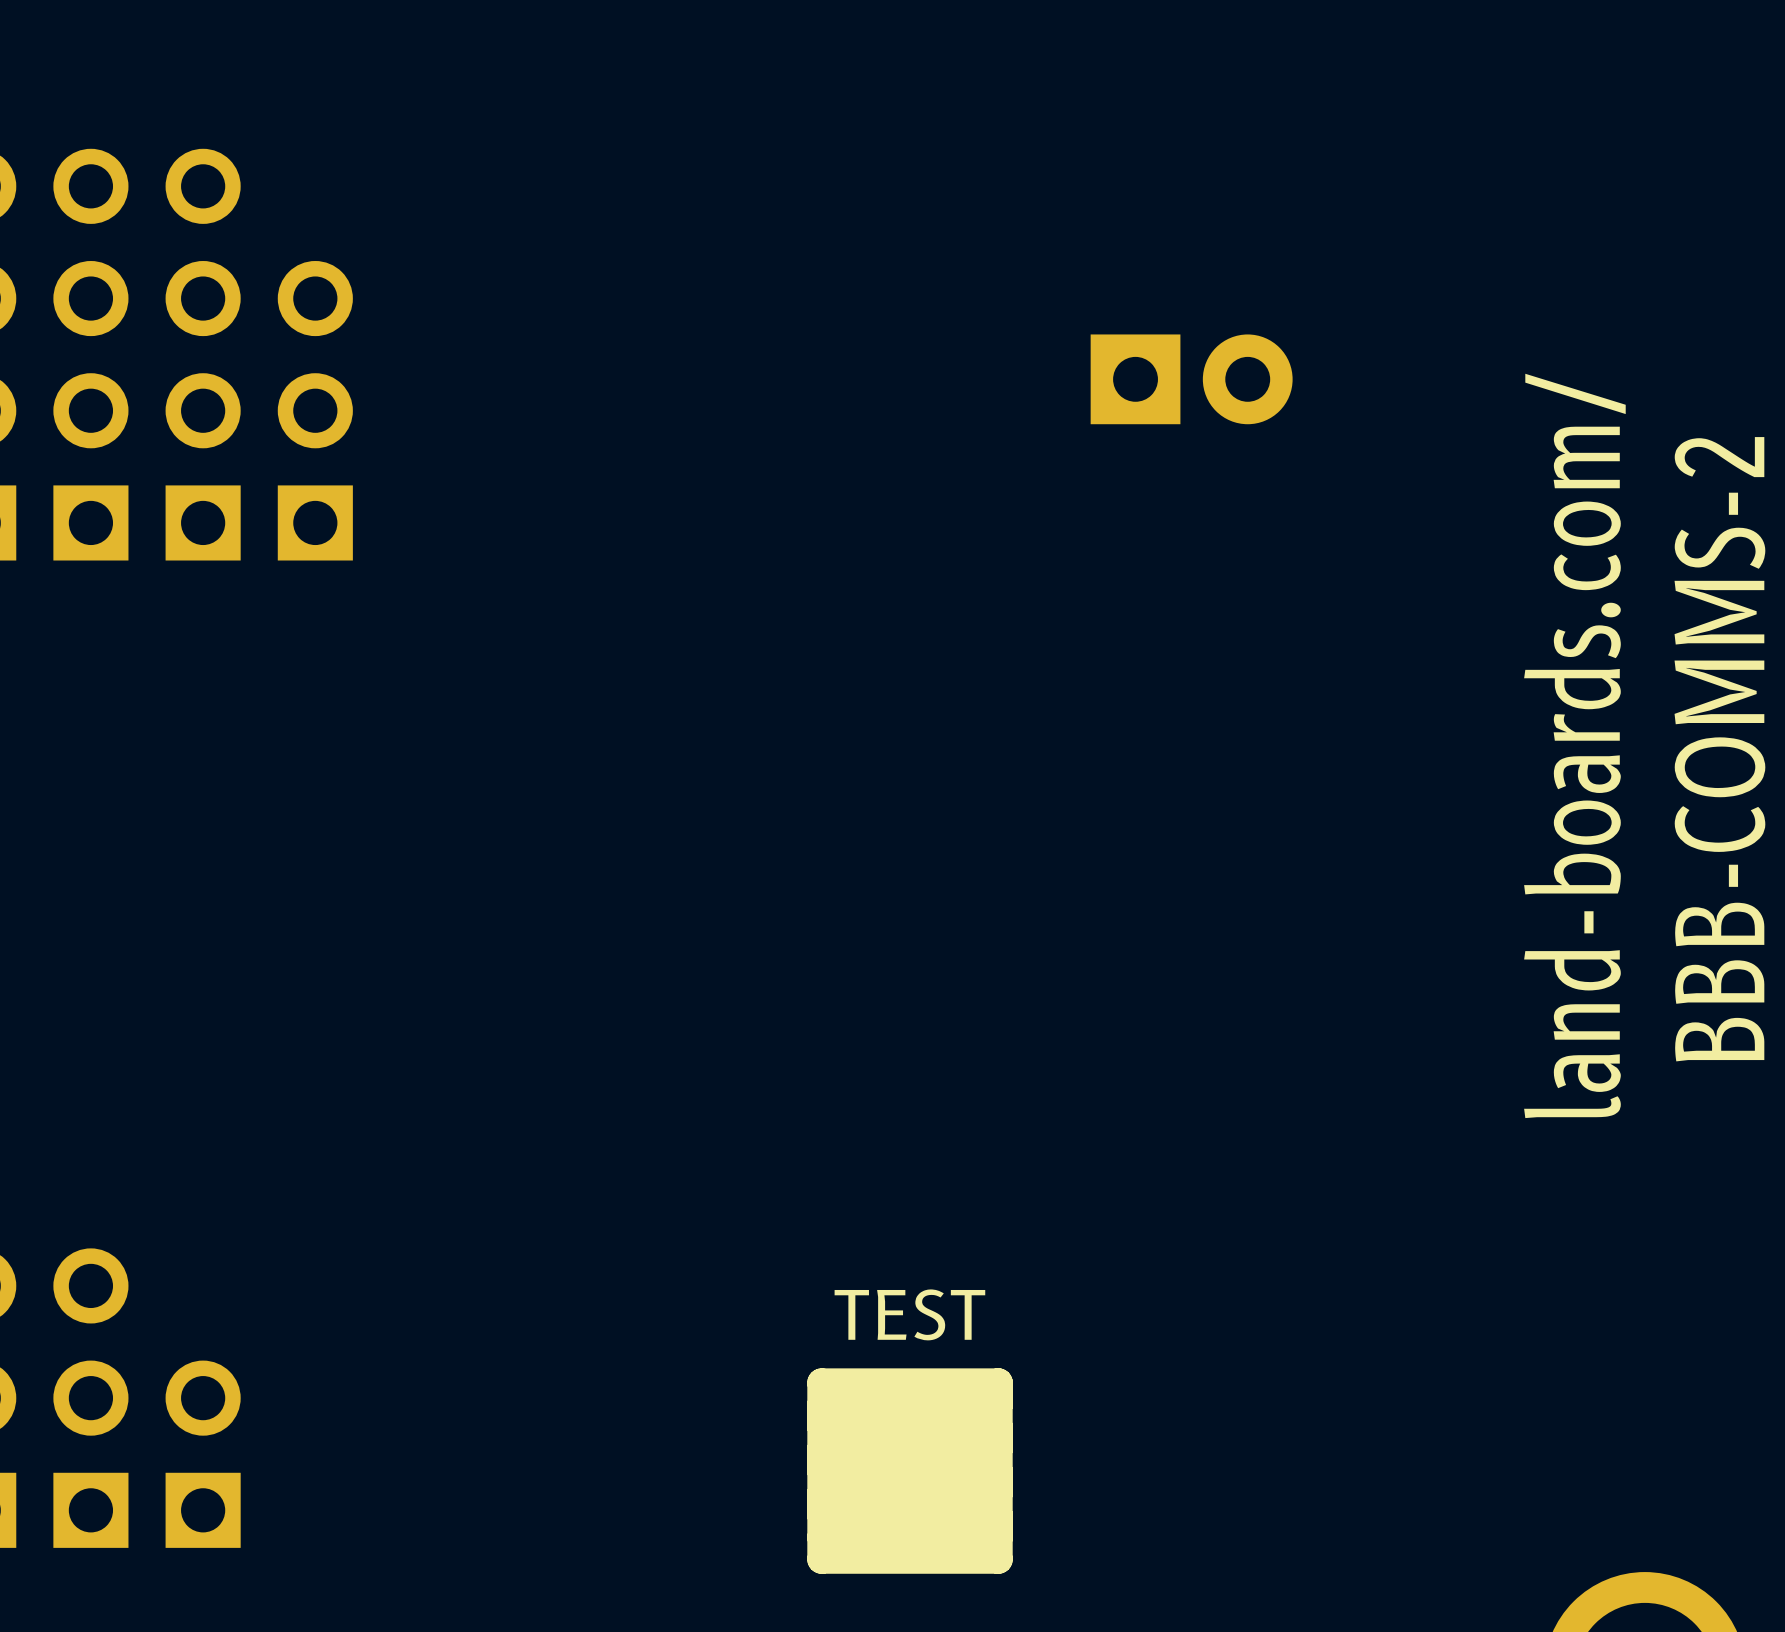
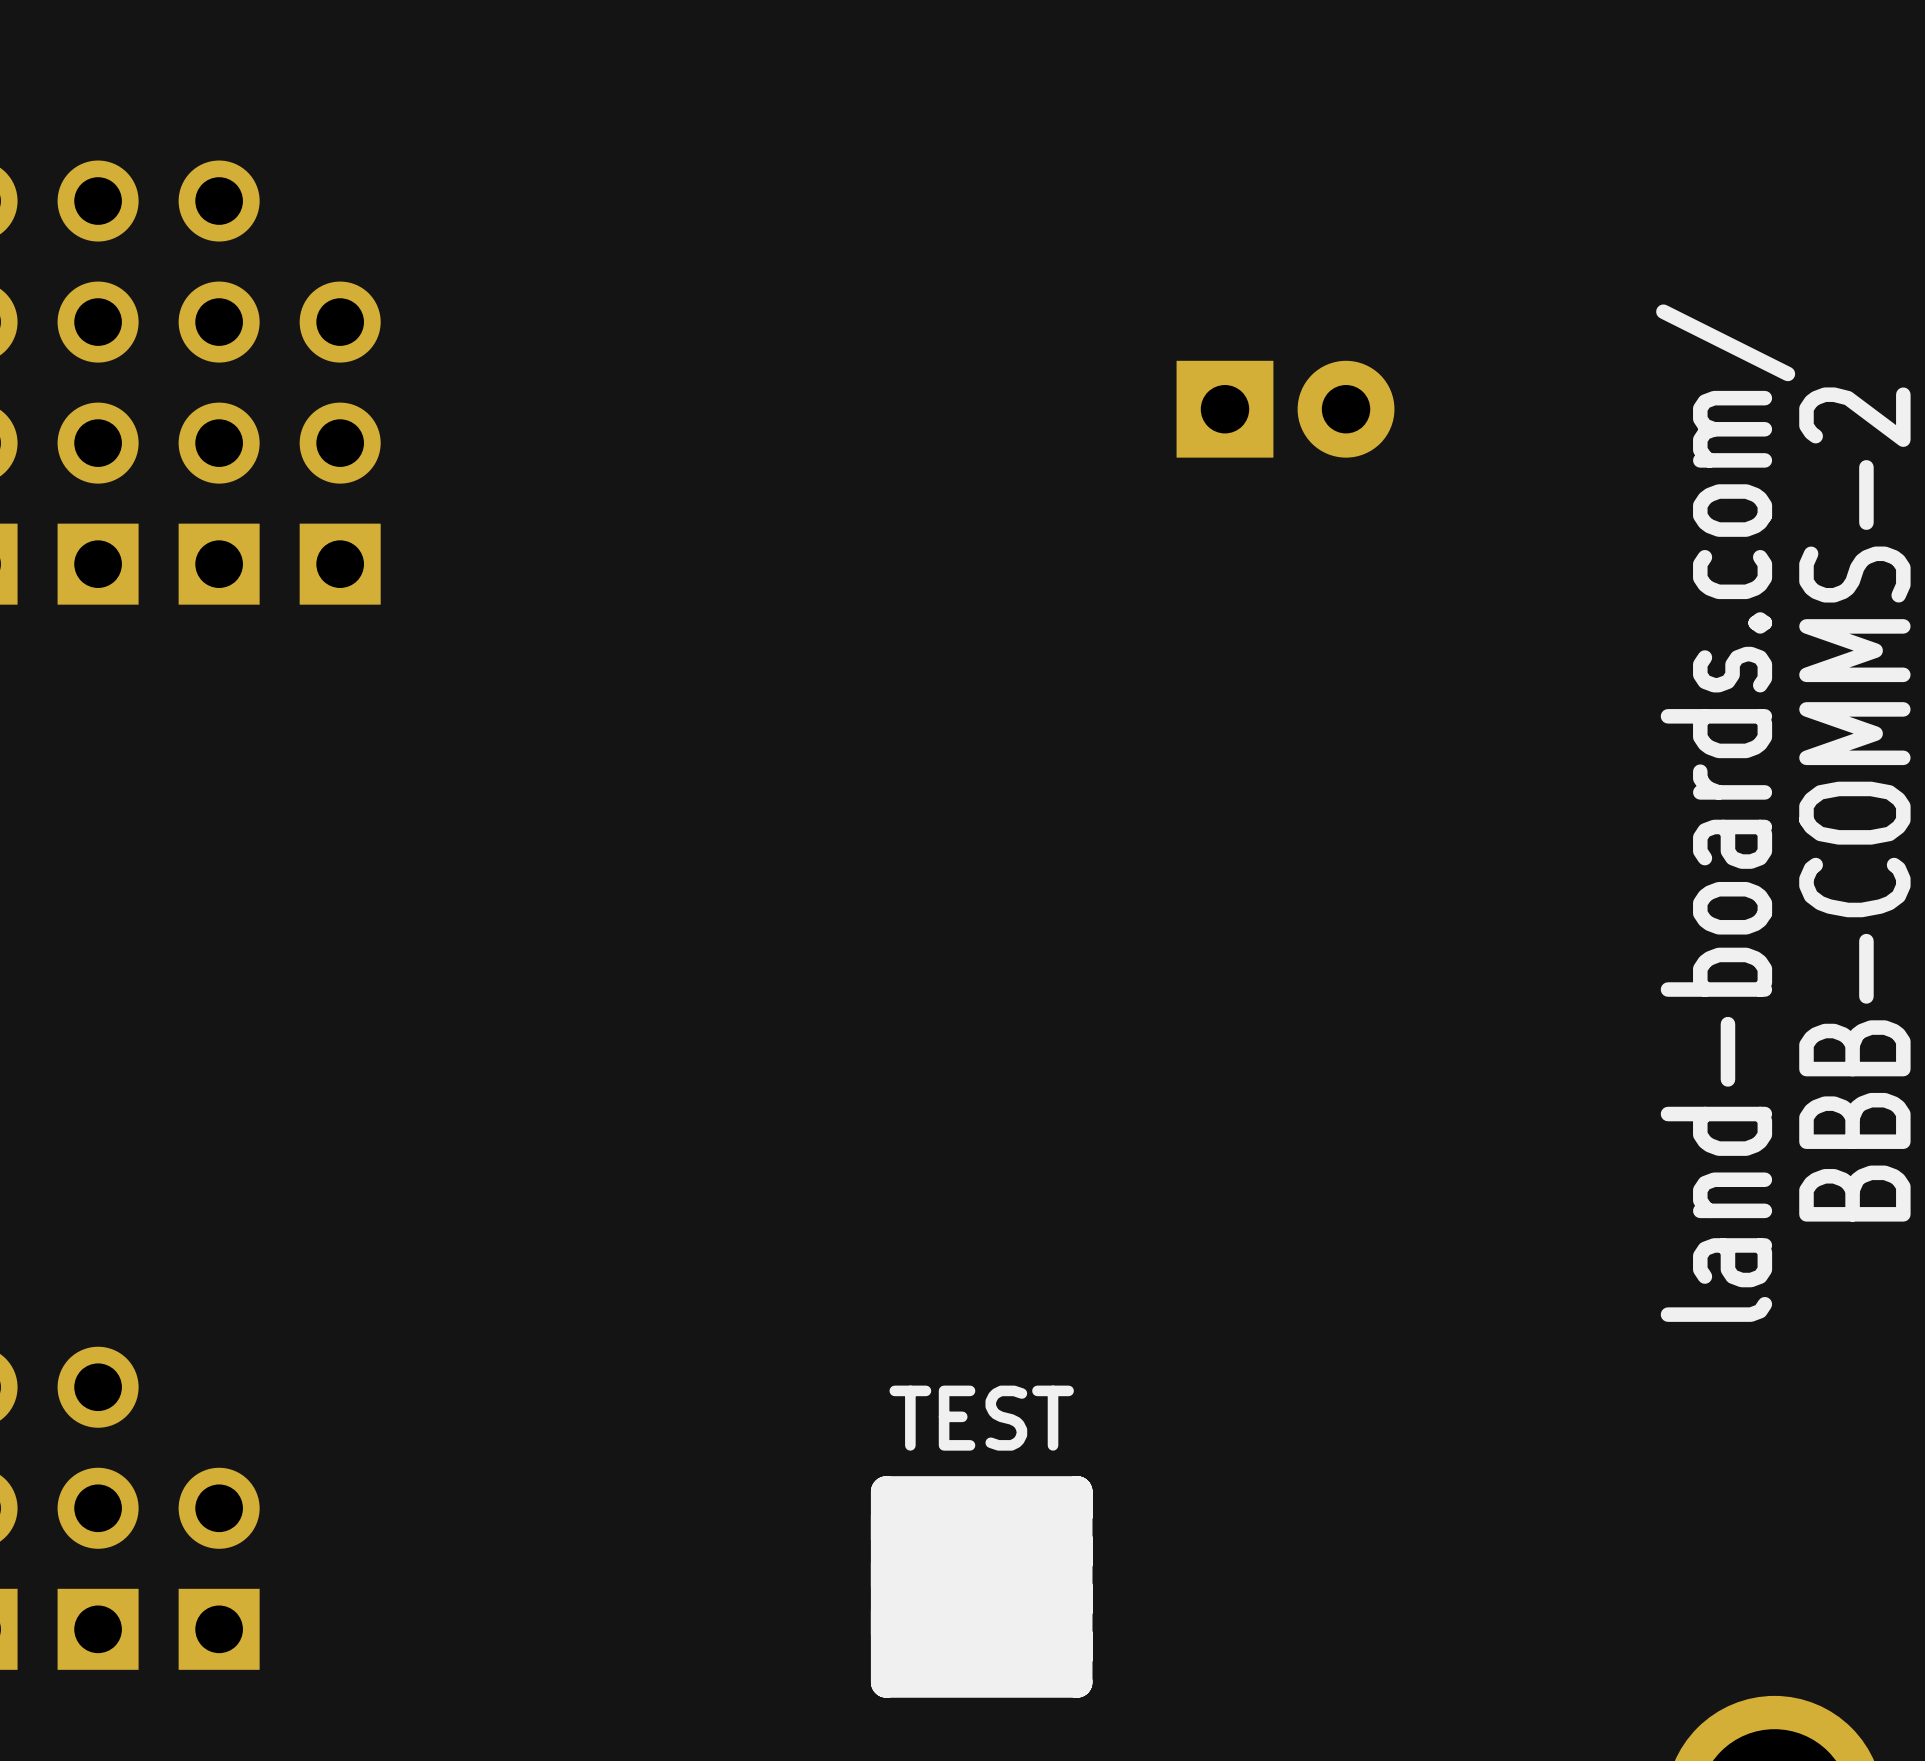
text position: land-boards.com/ (1574, 745) -> land-boards.com/ (1725, 813)

